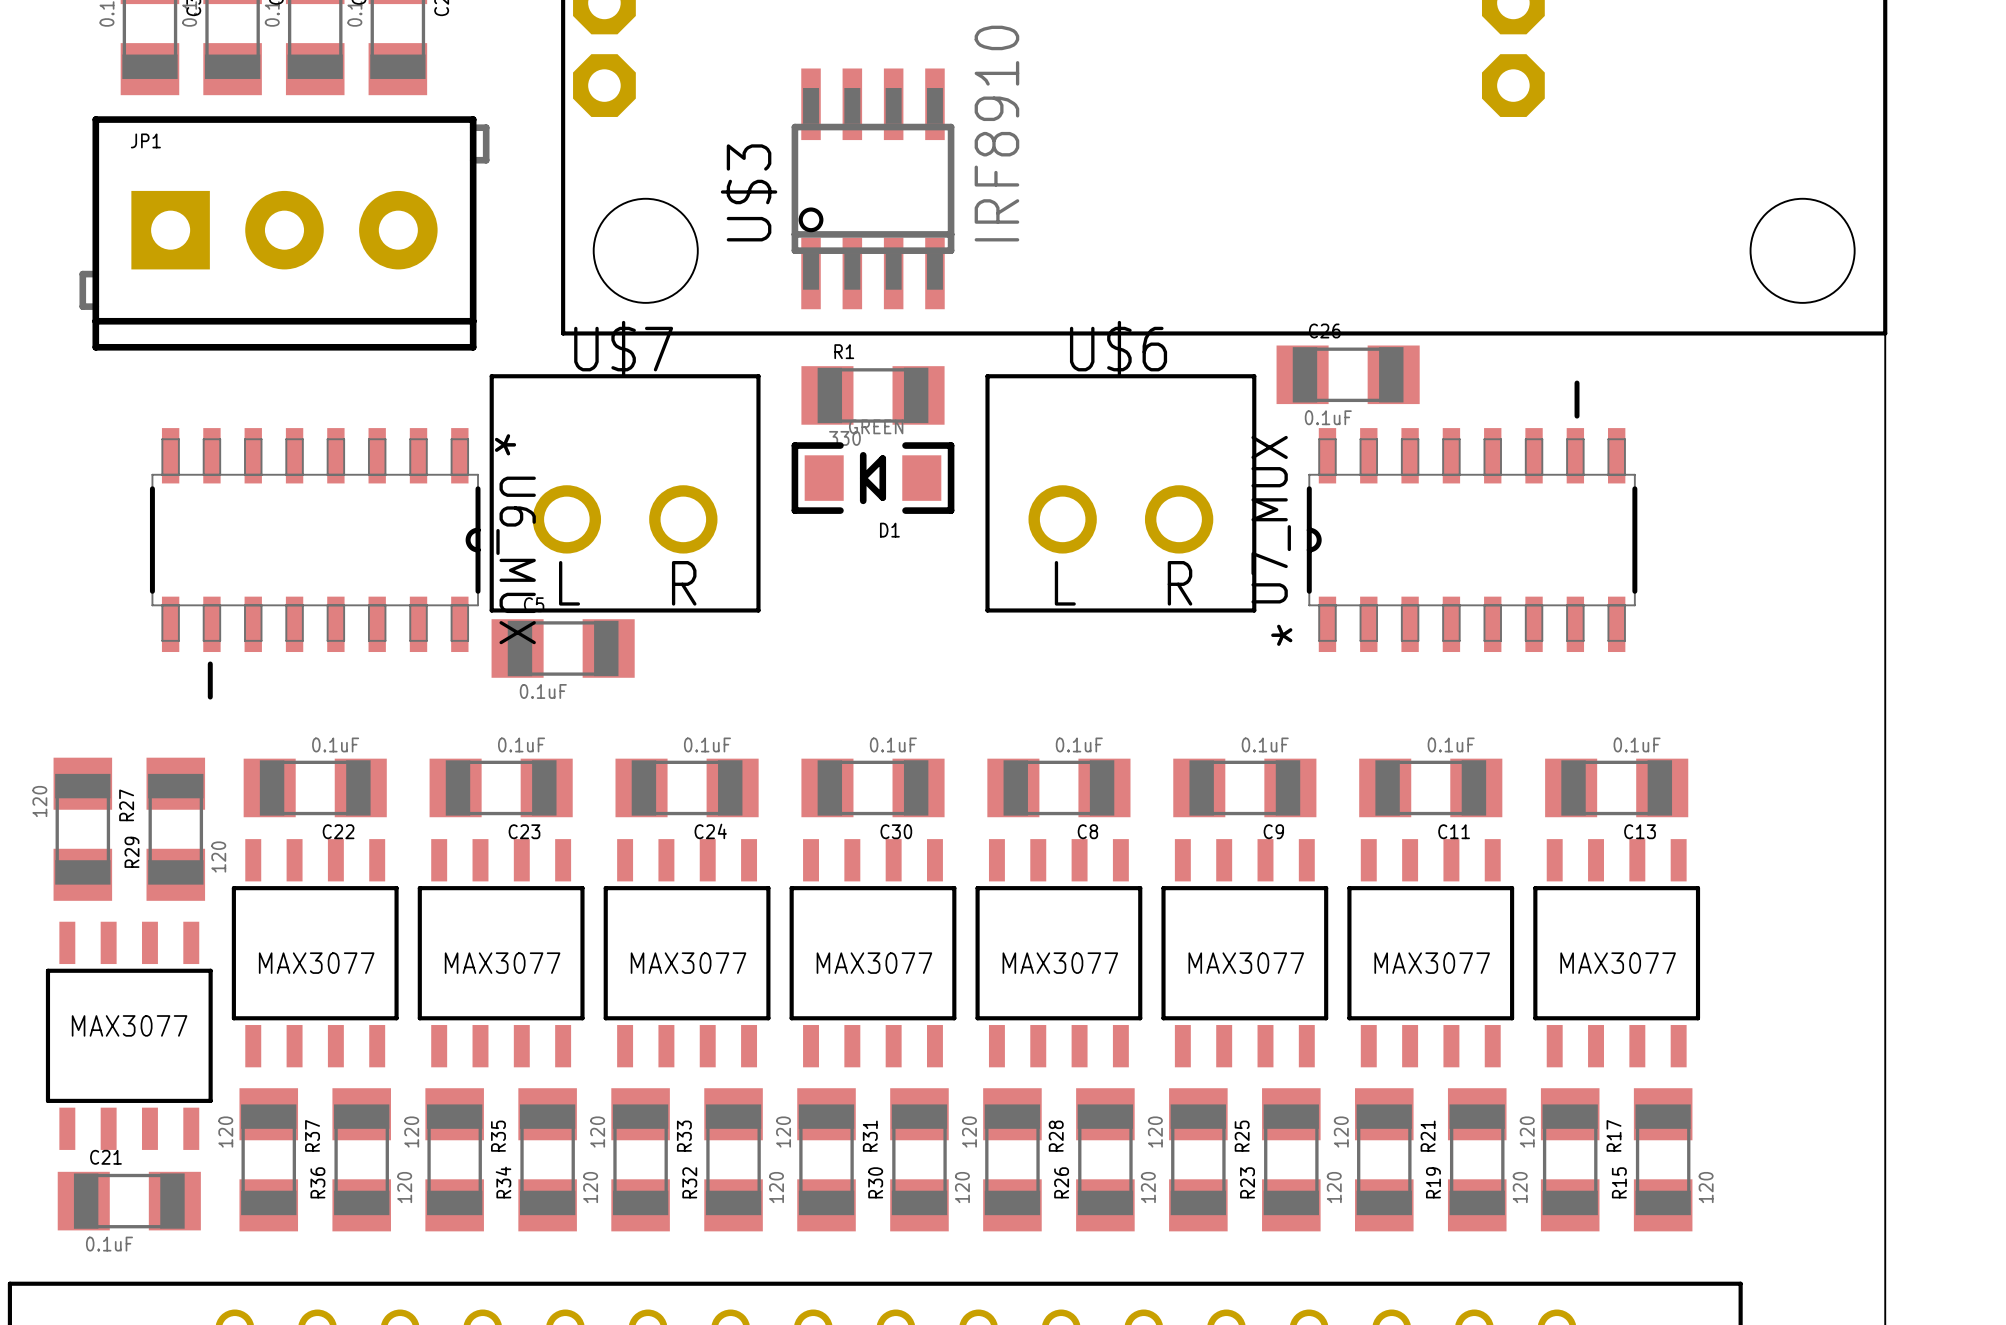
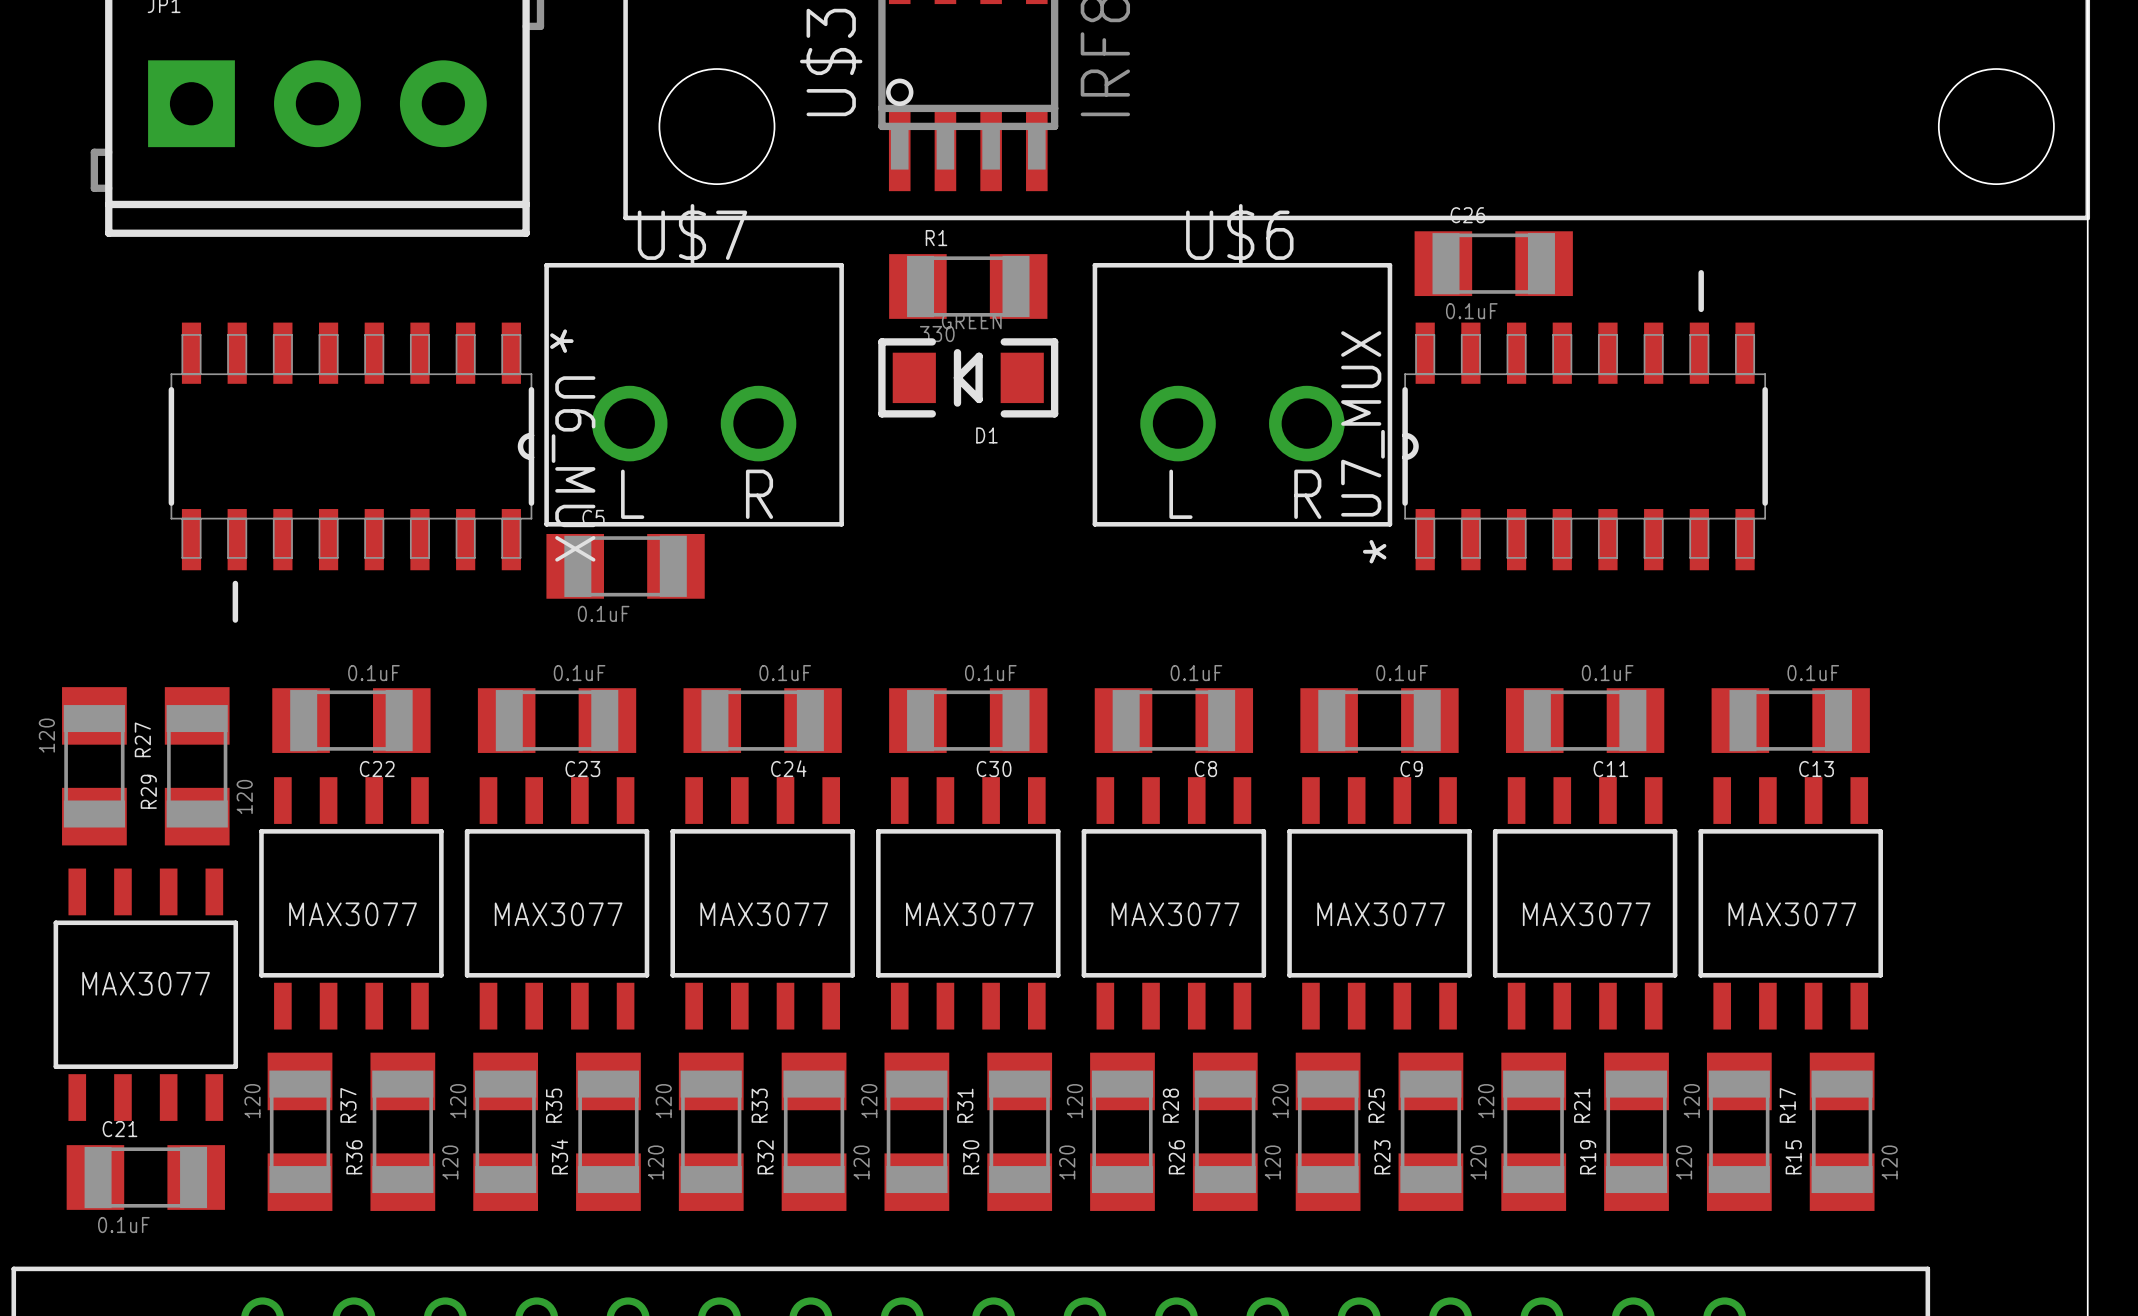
U7_MUX position: (1472, 516) -> (1585, 420)

